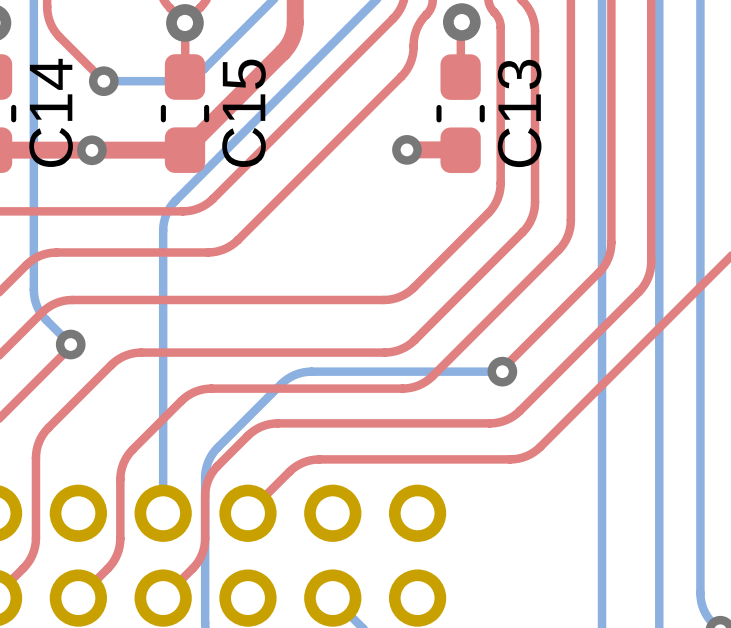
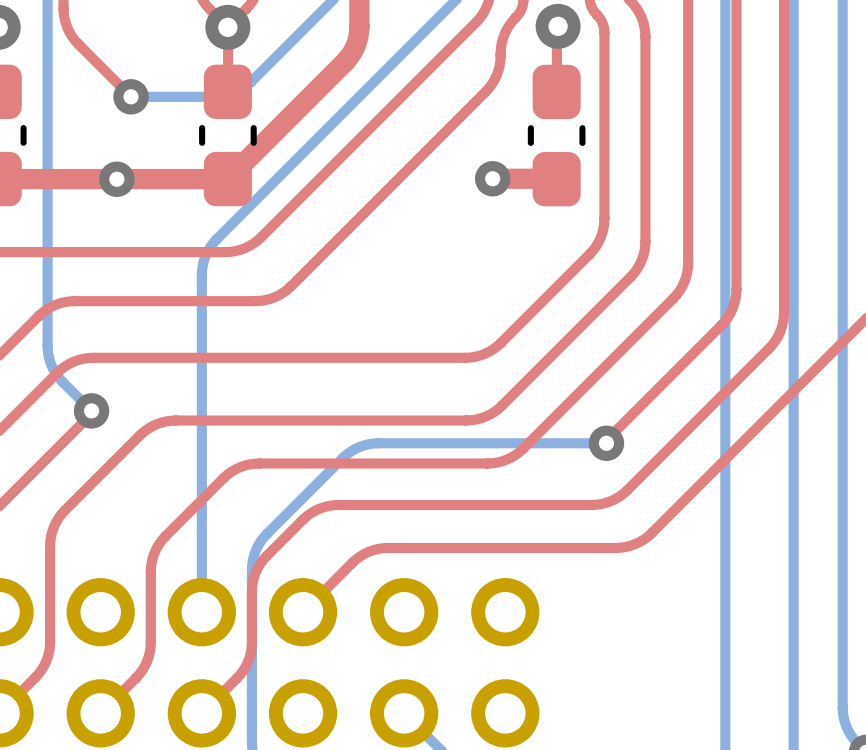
C14 name: C14 (51, 112) -> none
C15 name: C15 (244, 113) -> none
C13 name: C13 (519, 113) -> none

